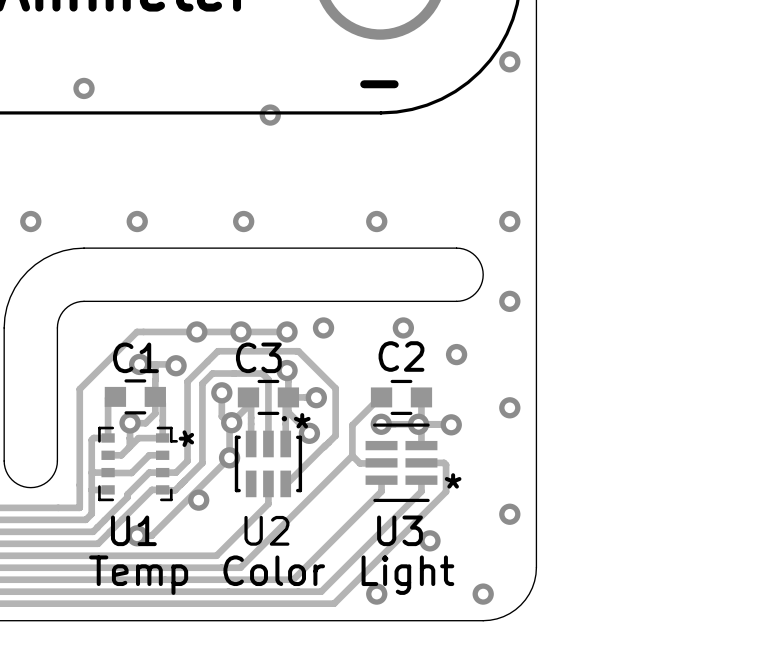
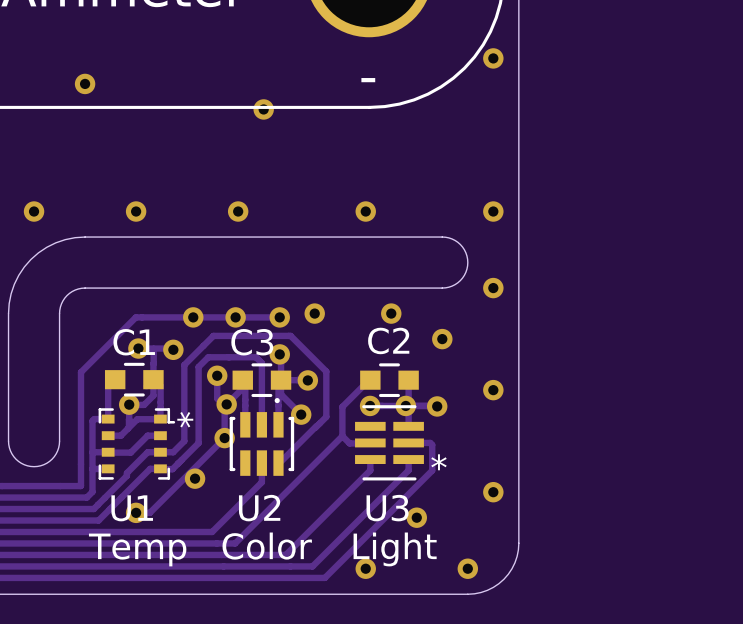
text: * (302, 420) -> none

